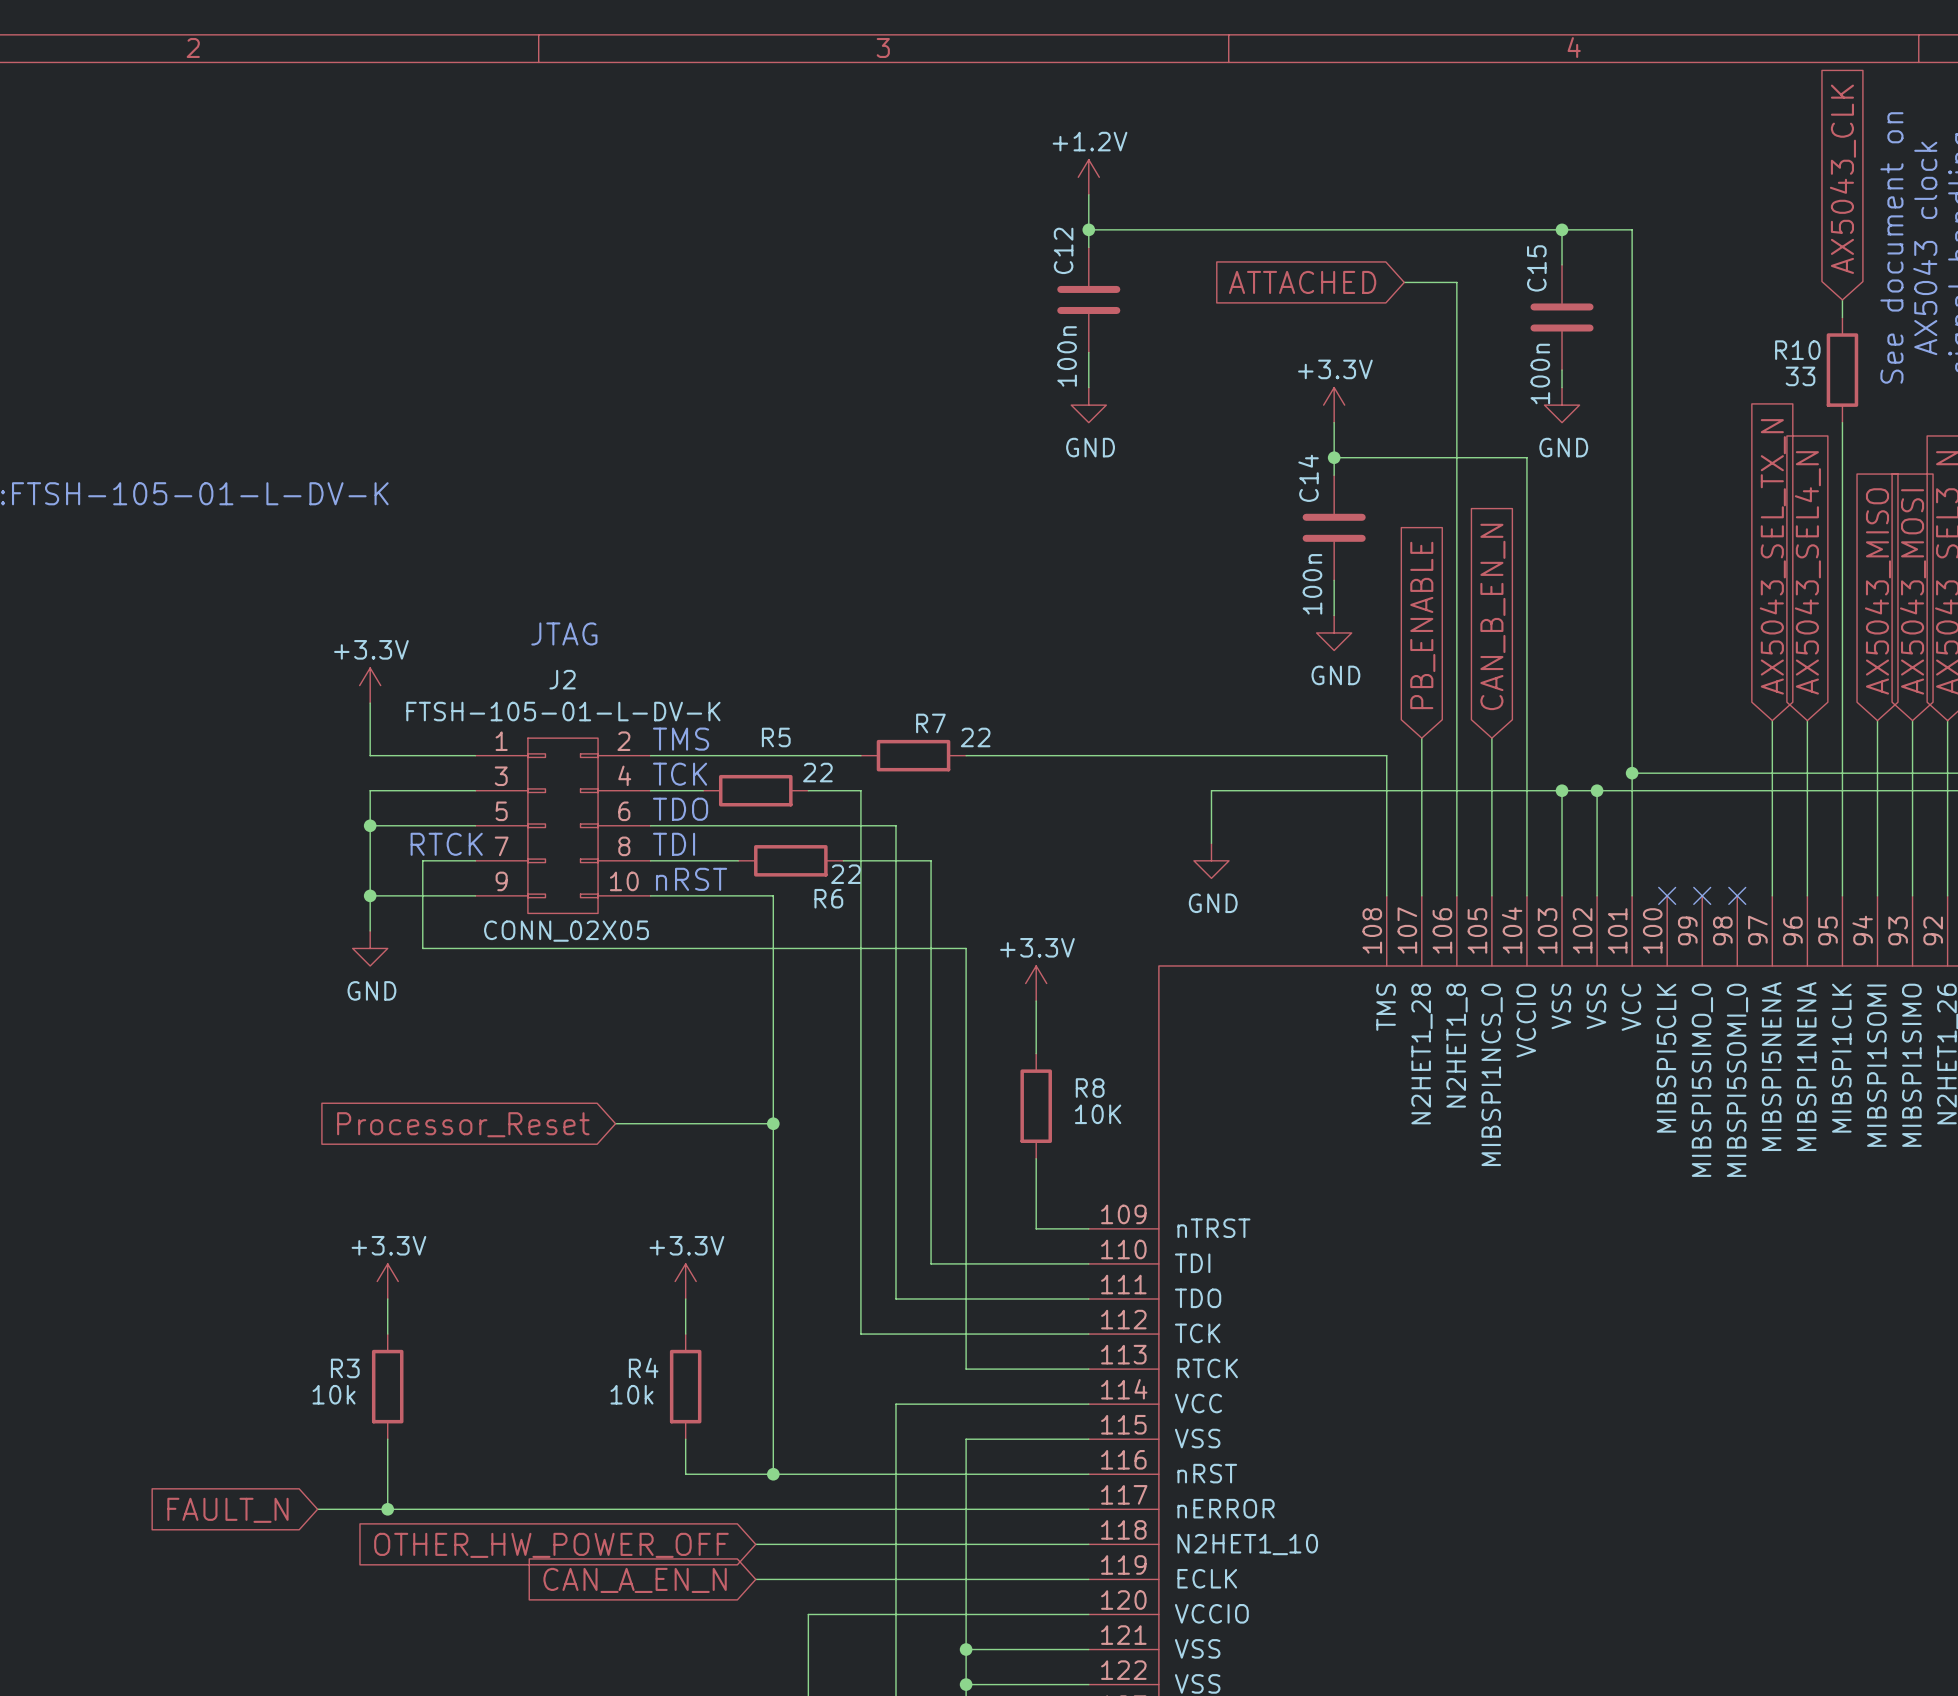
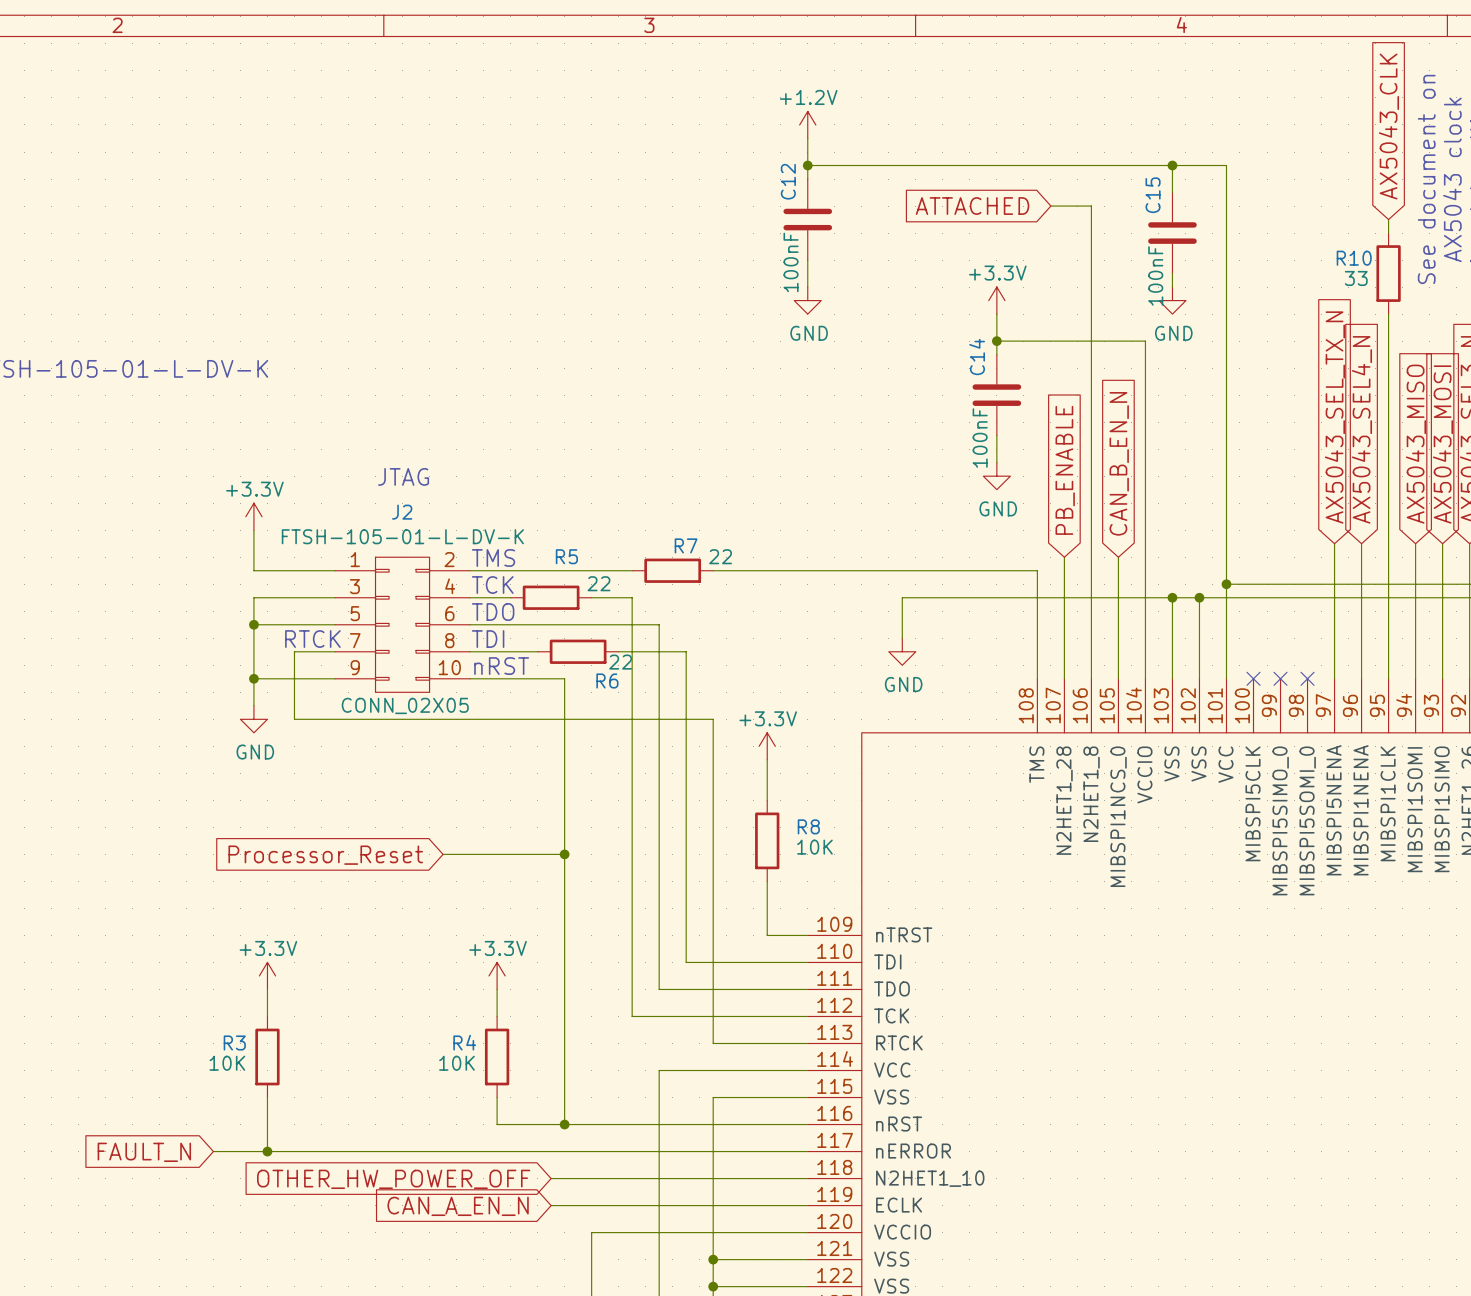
C12 value: 100n (1067, 356) -> 100nF (791, 262)
C15 value: 100n (1540, 373) -> 100nF (1155, 275)
C14 value: 100n (1312, 584) -> 100nF (980, 438)
R3 value: 10k (334, 1394) -> 10K (227, 1063)
R4 value: 10k (631, 1394) -> 10K (456, 1063)

